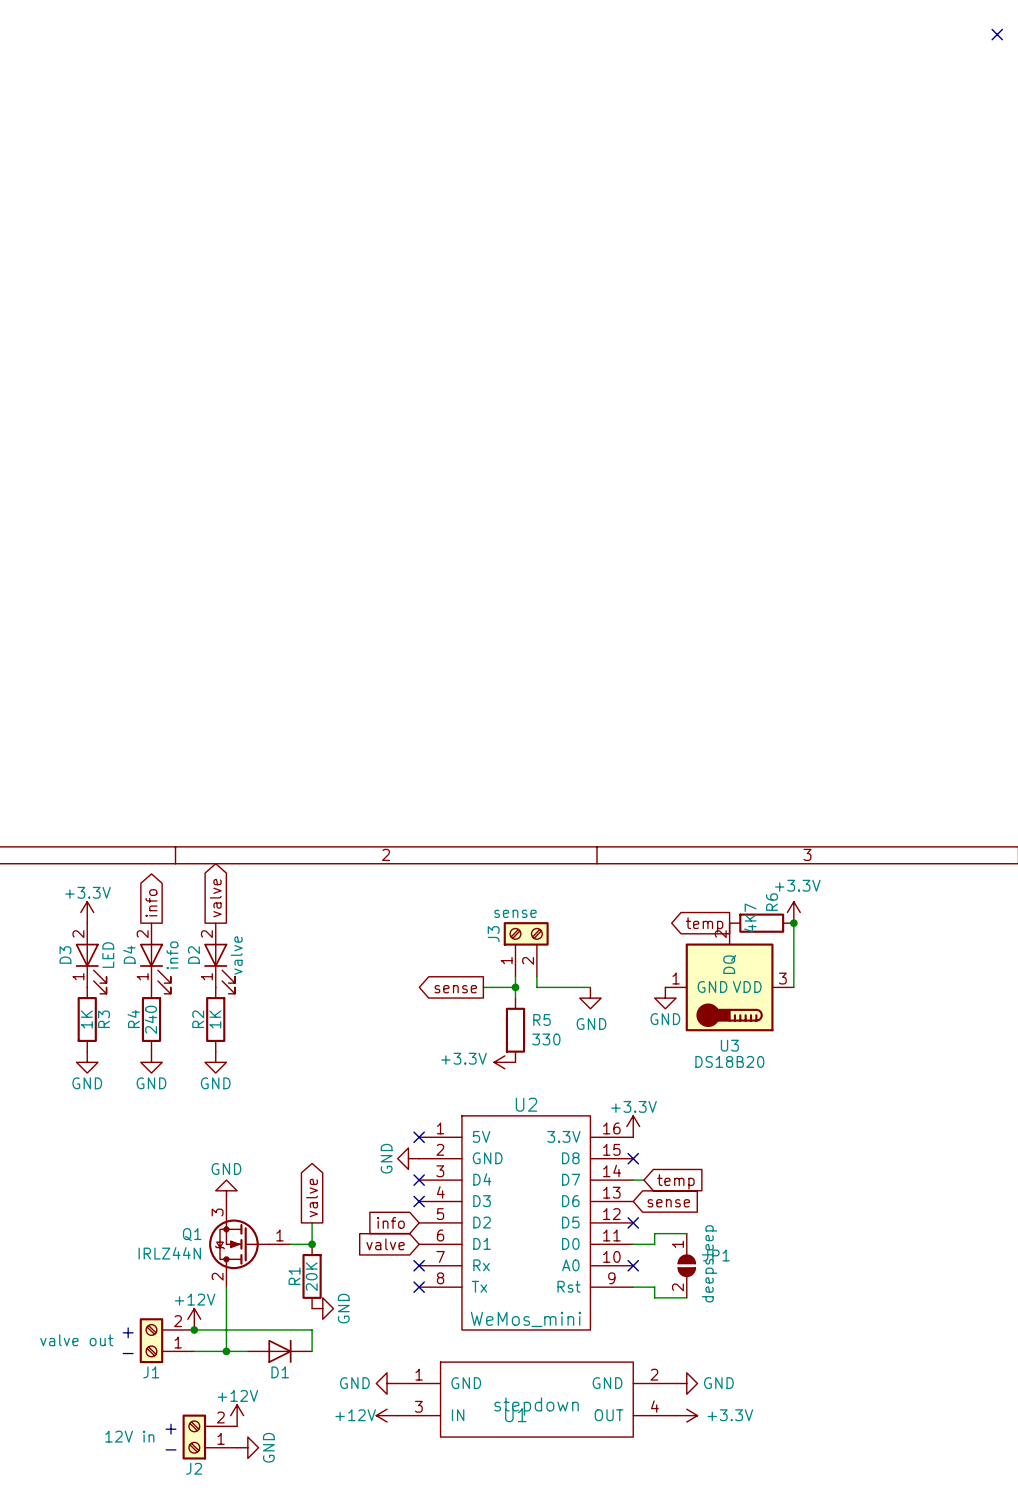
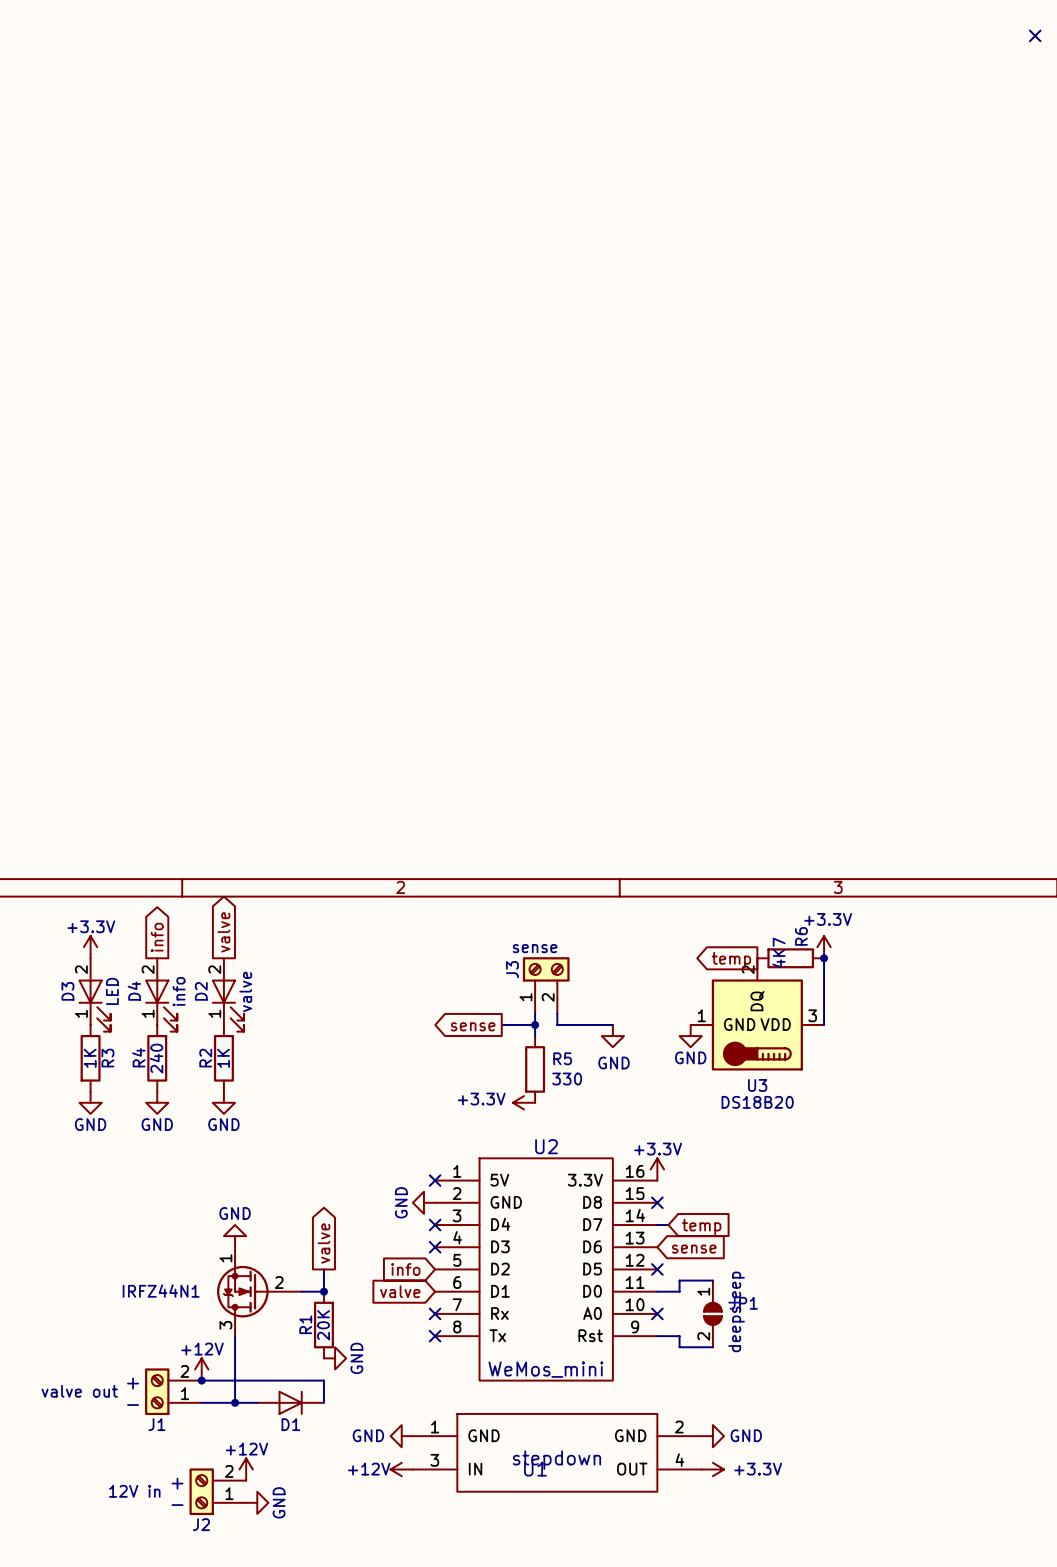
Q1: IRLZ44N (249, 1244) -> none
IRFZ44N1: none -> (259, 1291)

